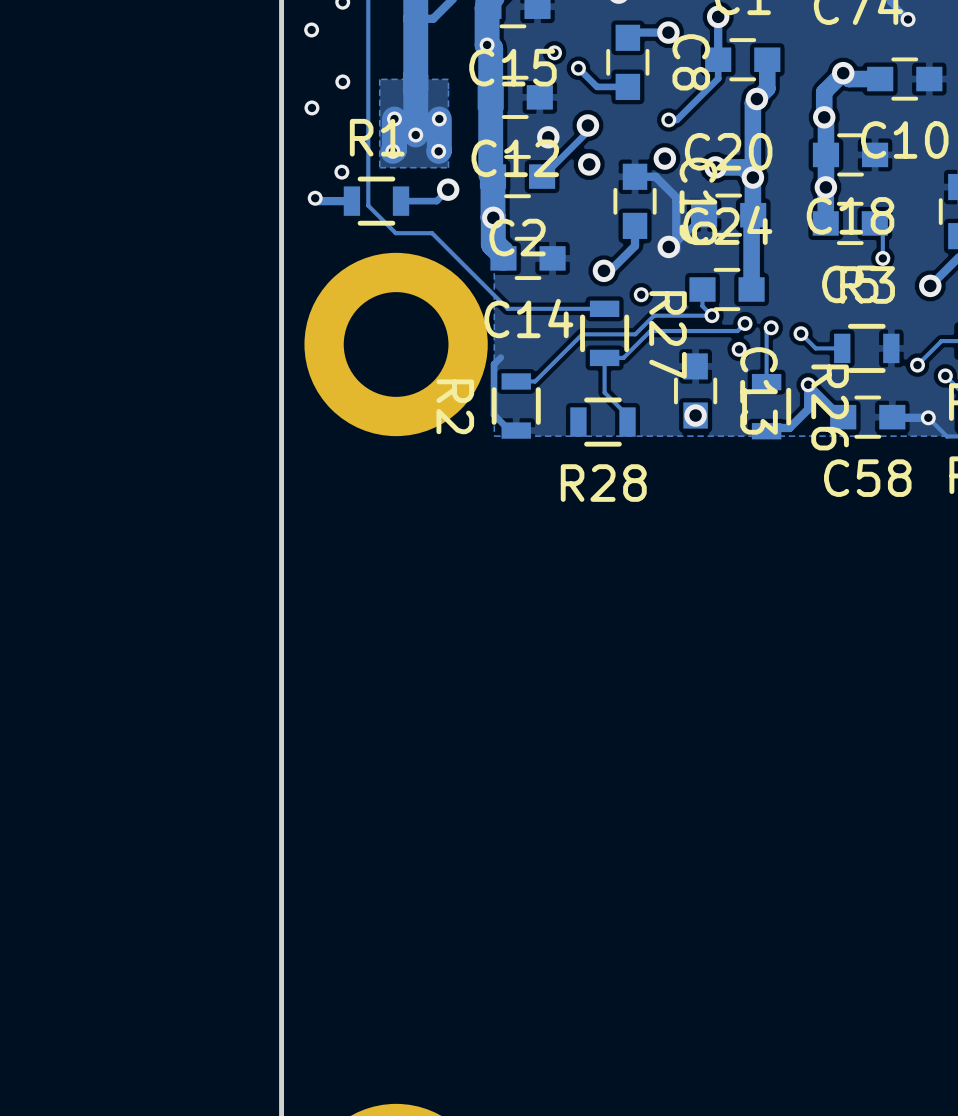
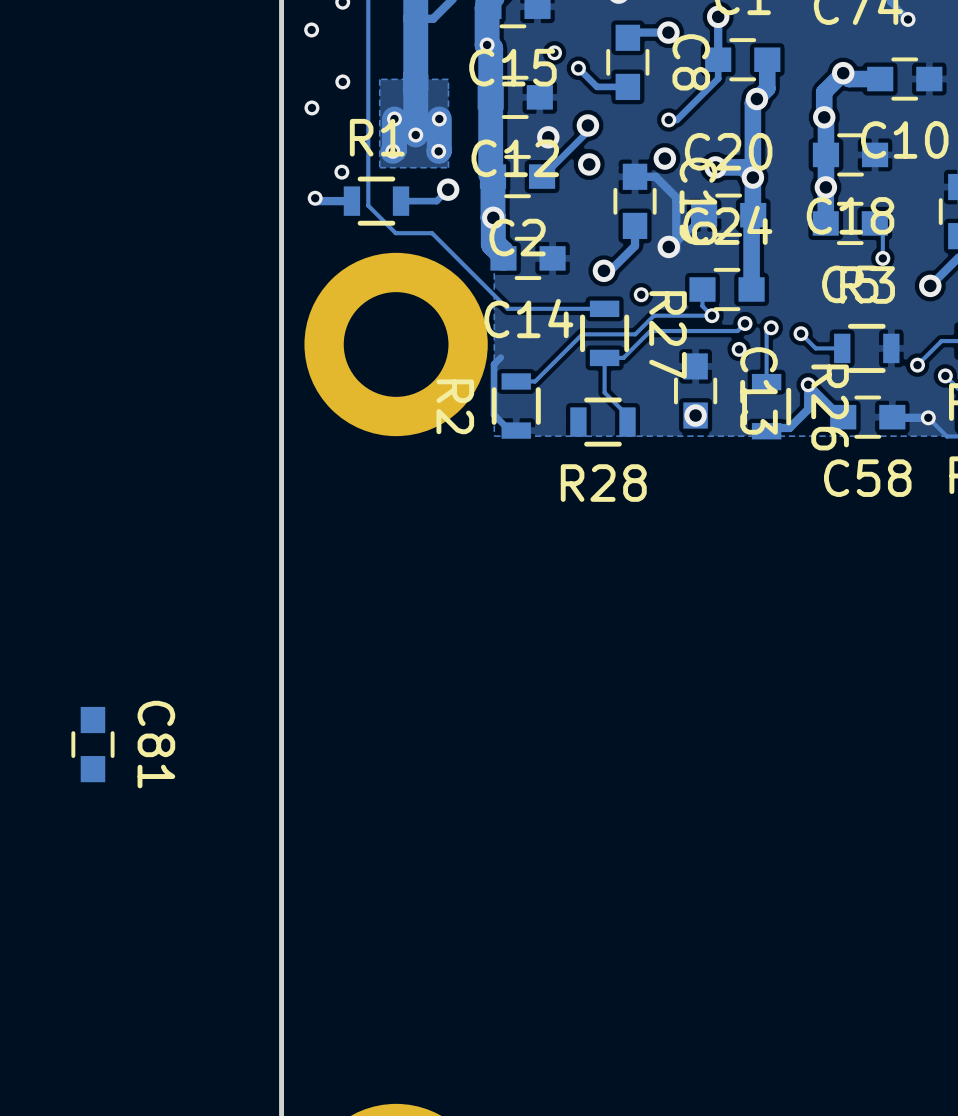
C81: none -> (92, 744)

